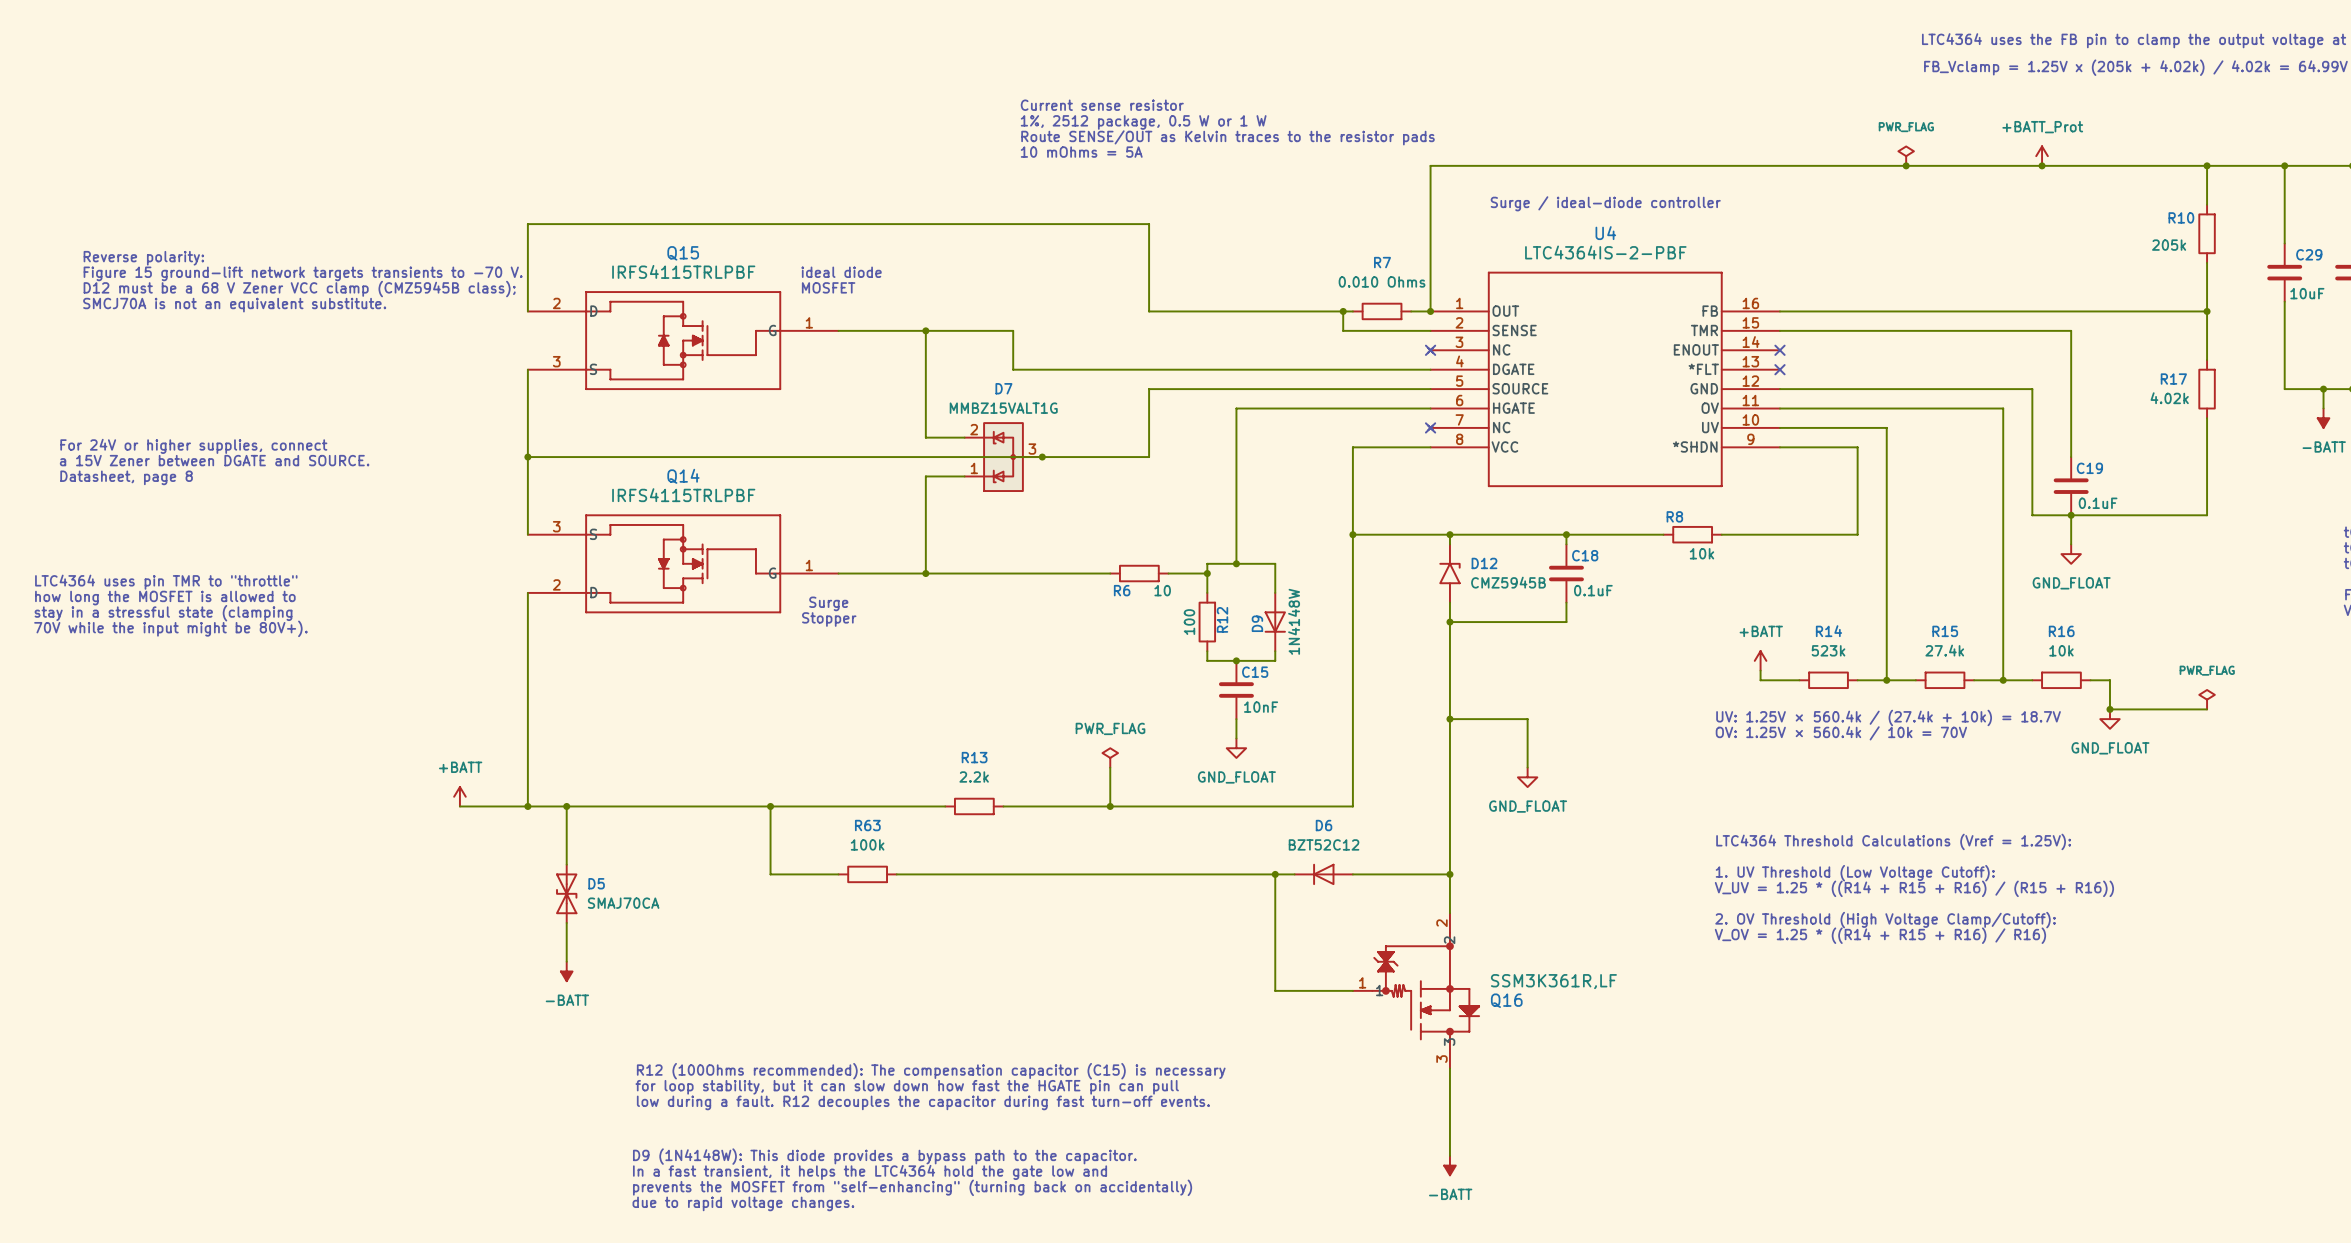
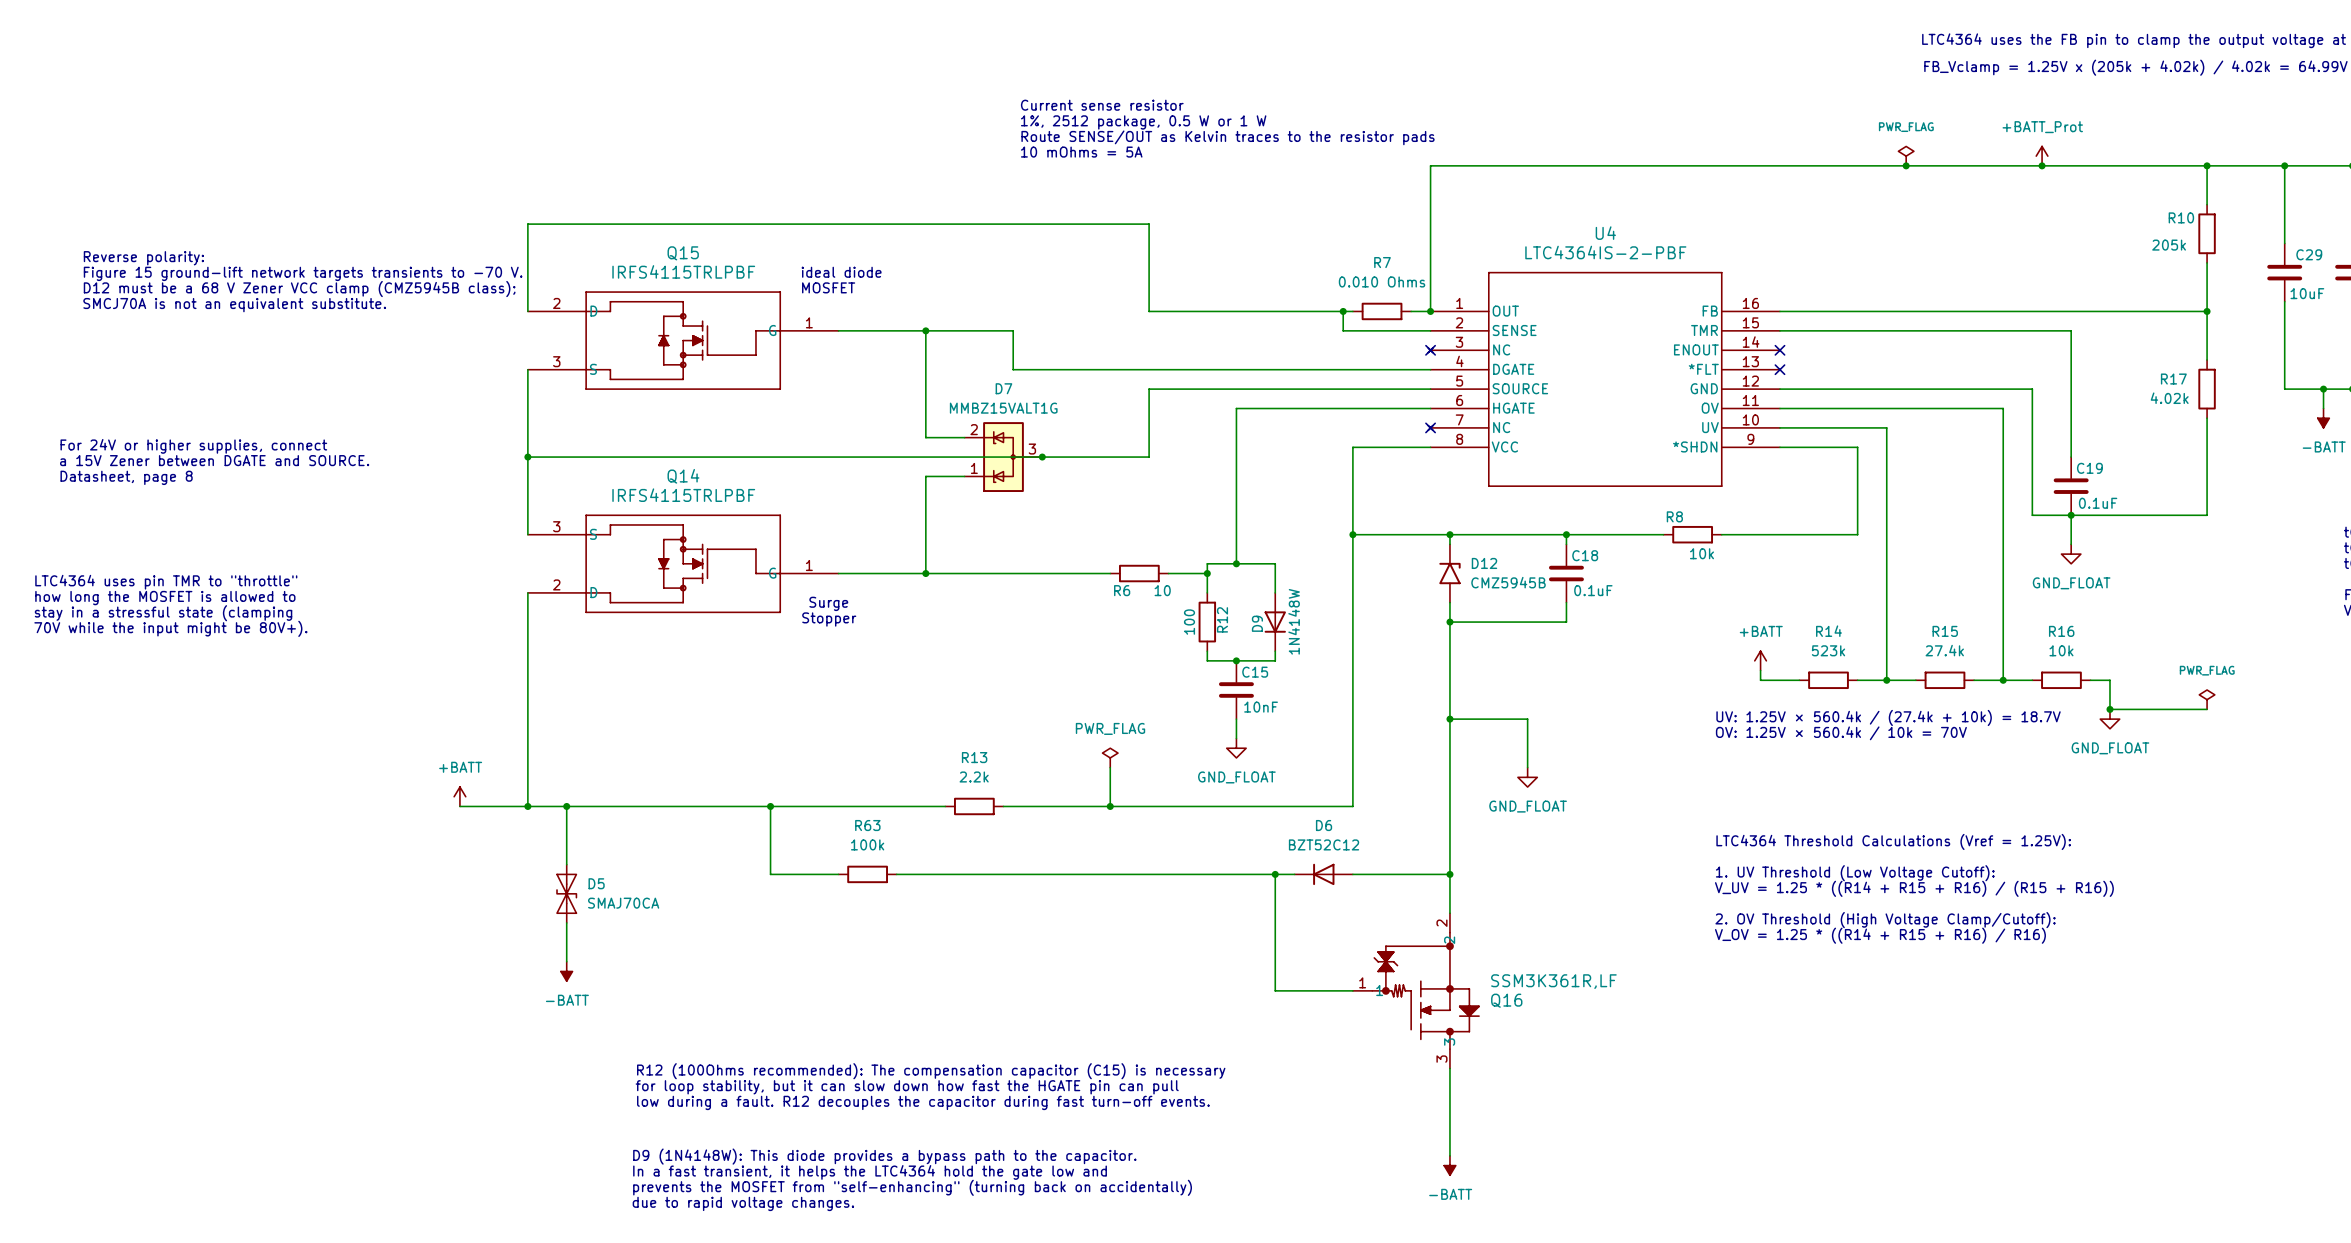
text: Surge / ideal-diode controller (1605, 203) -> none

